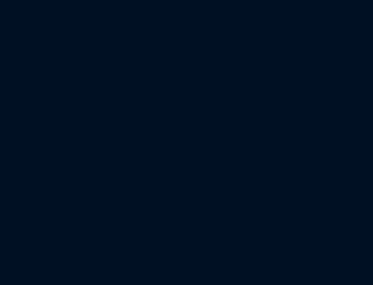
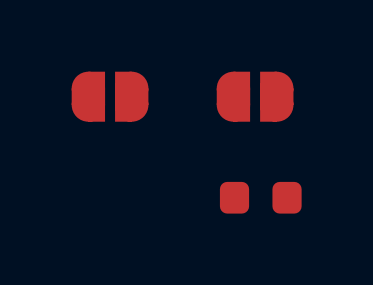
part: none -> (110, 96)
part: none -> (255, 96)
part: none -> (260, 197)

